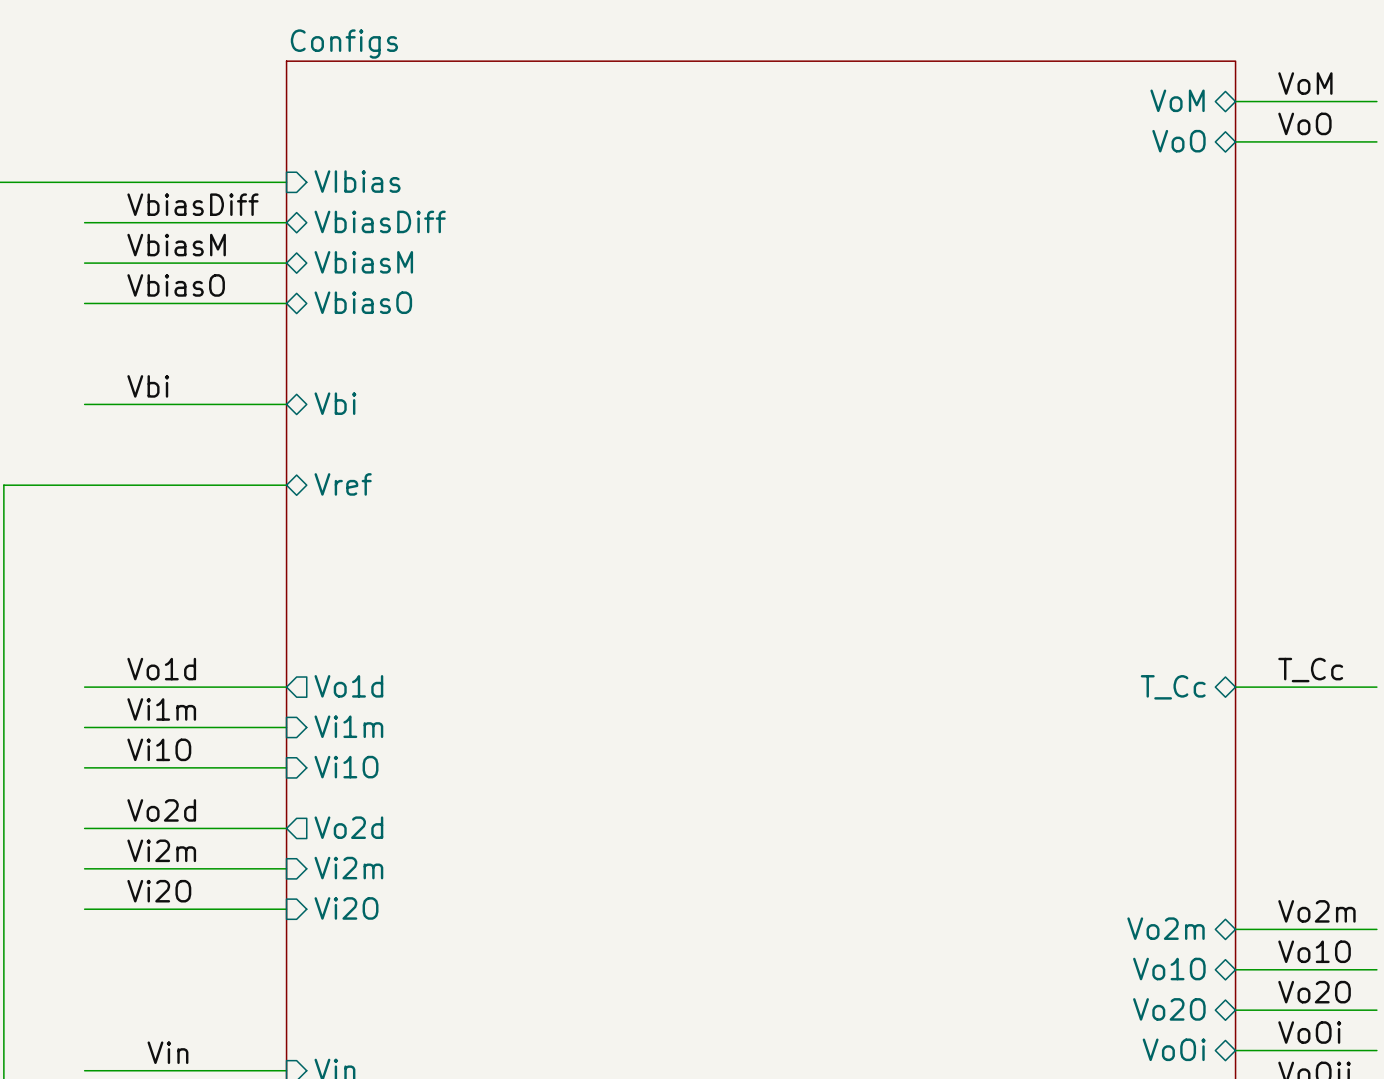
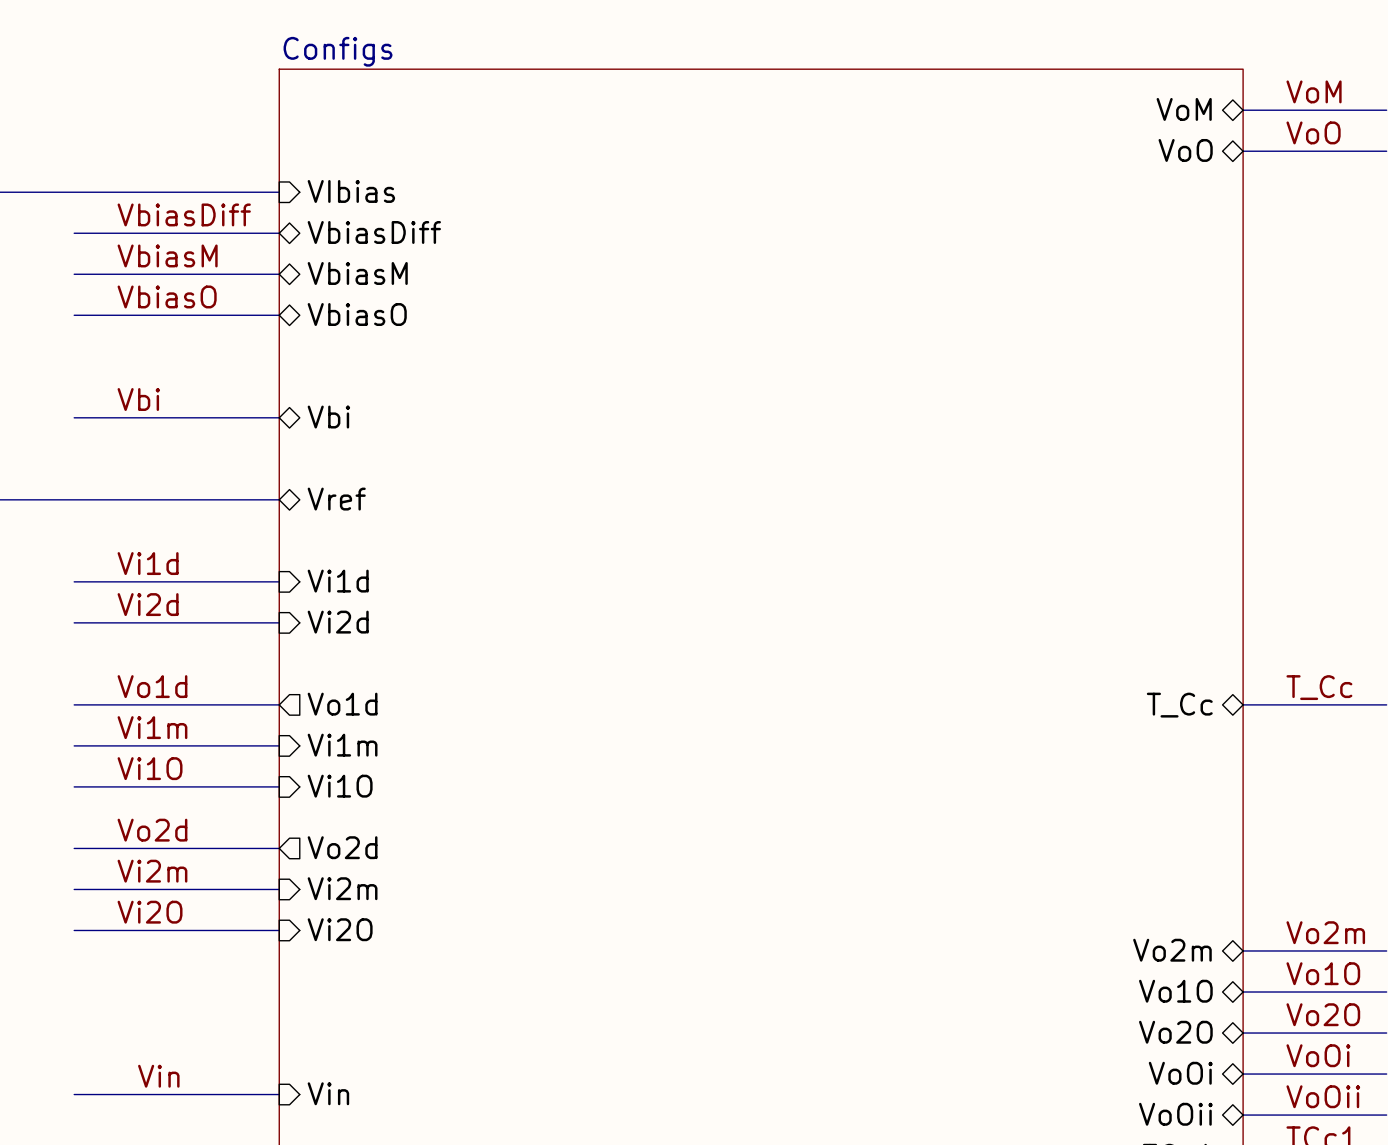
label: none -> Vi1d (148, 563)
wire: none -> (74, 581) (279, 581)
sheet pin: none -> Vi1d (338, 581)
label: none -> Vi2d (148, 604)
sheet pin: none -> Vi2d (338, 622)
wire: none -> (74, 622) (279, 622)

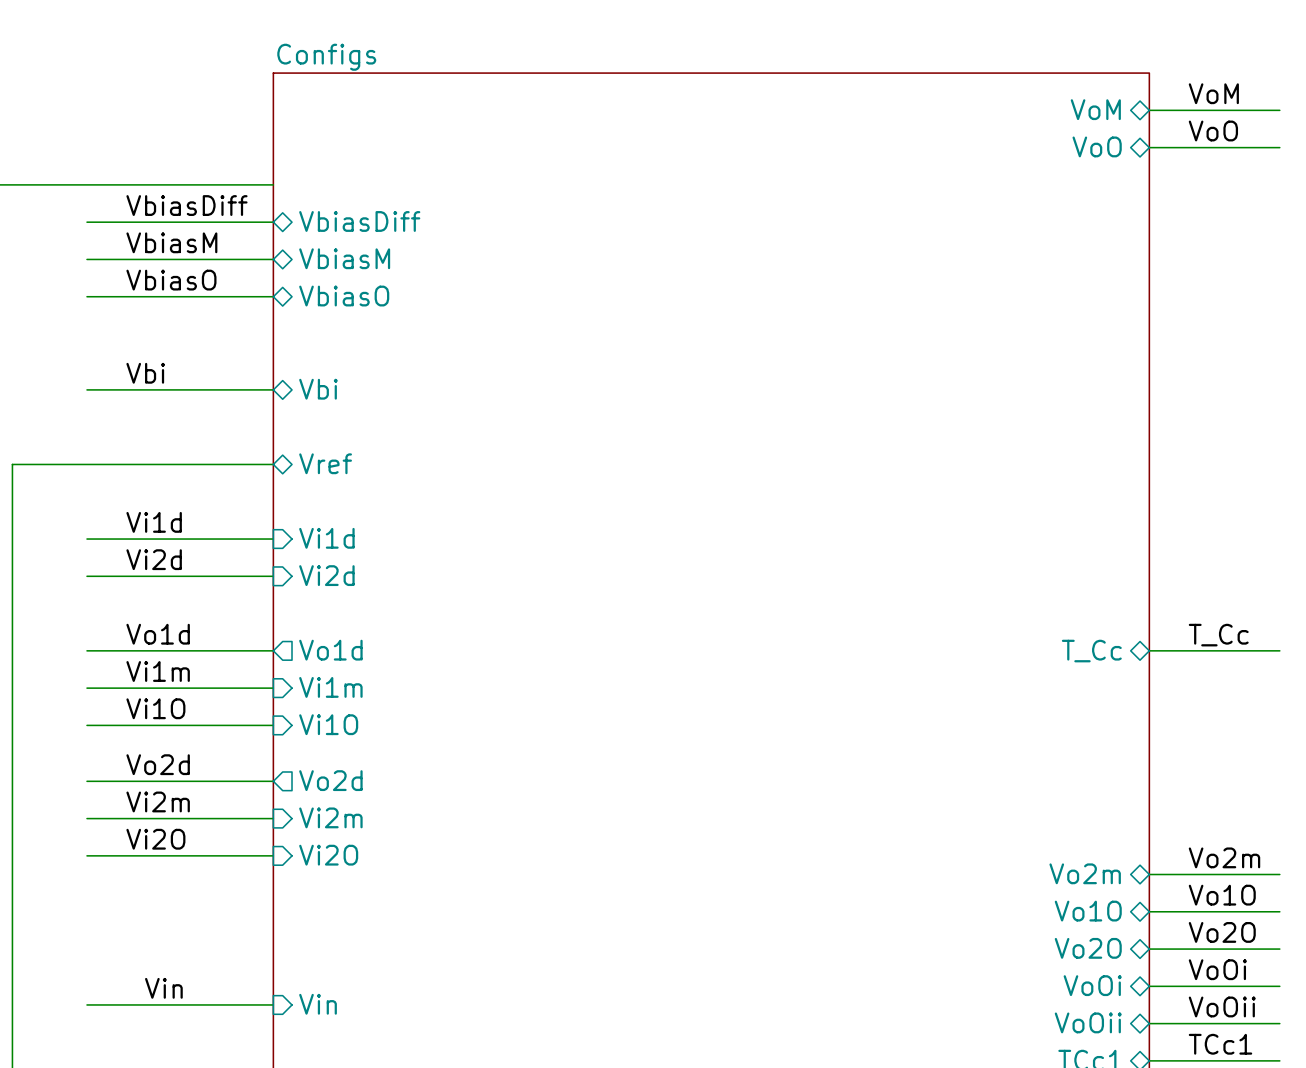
sheet pin: VIbias (351, 191) -> none

